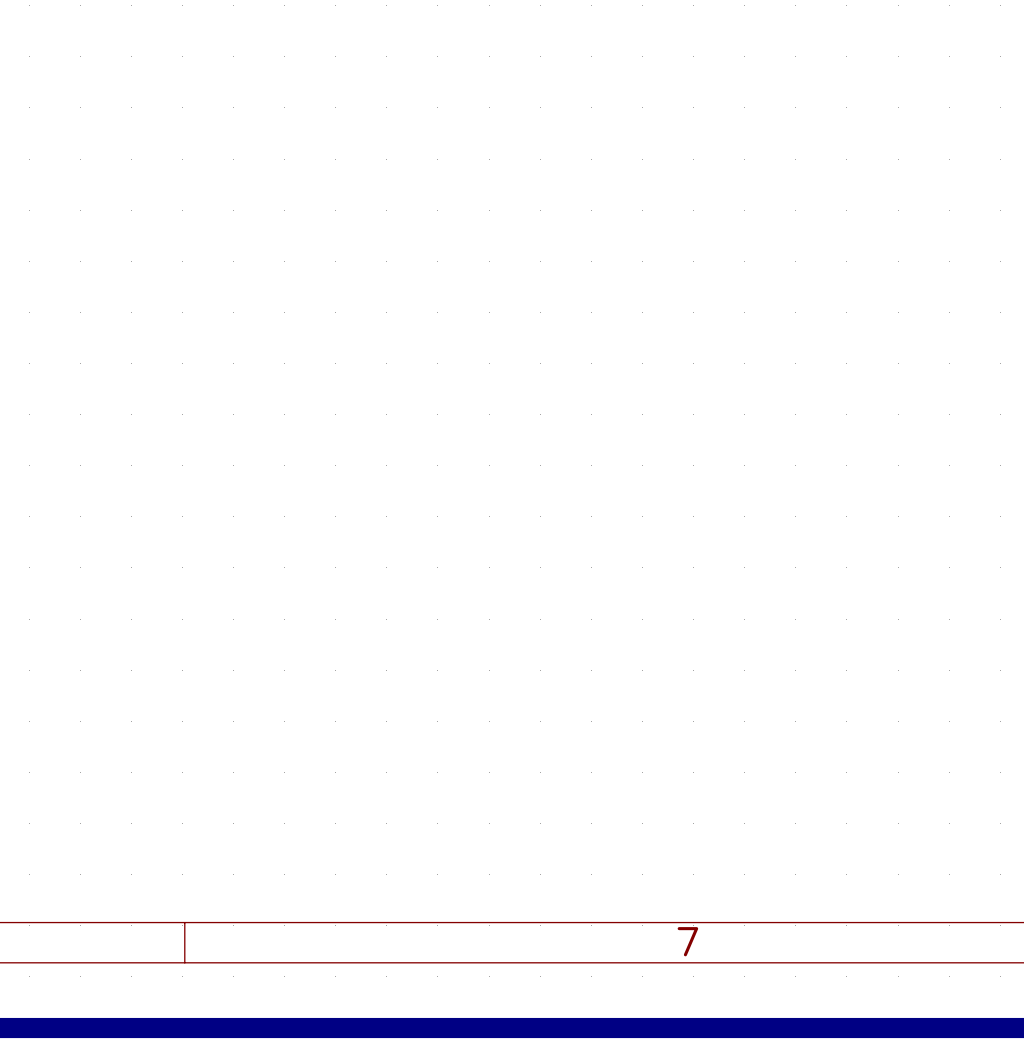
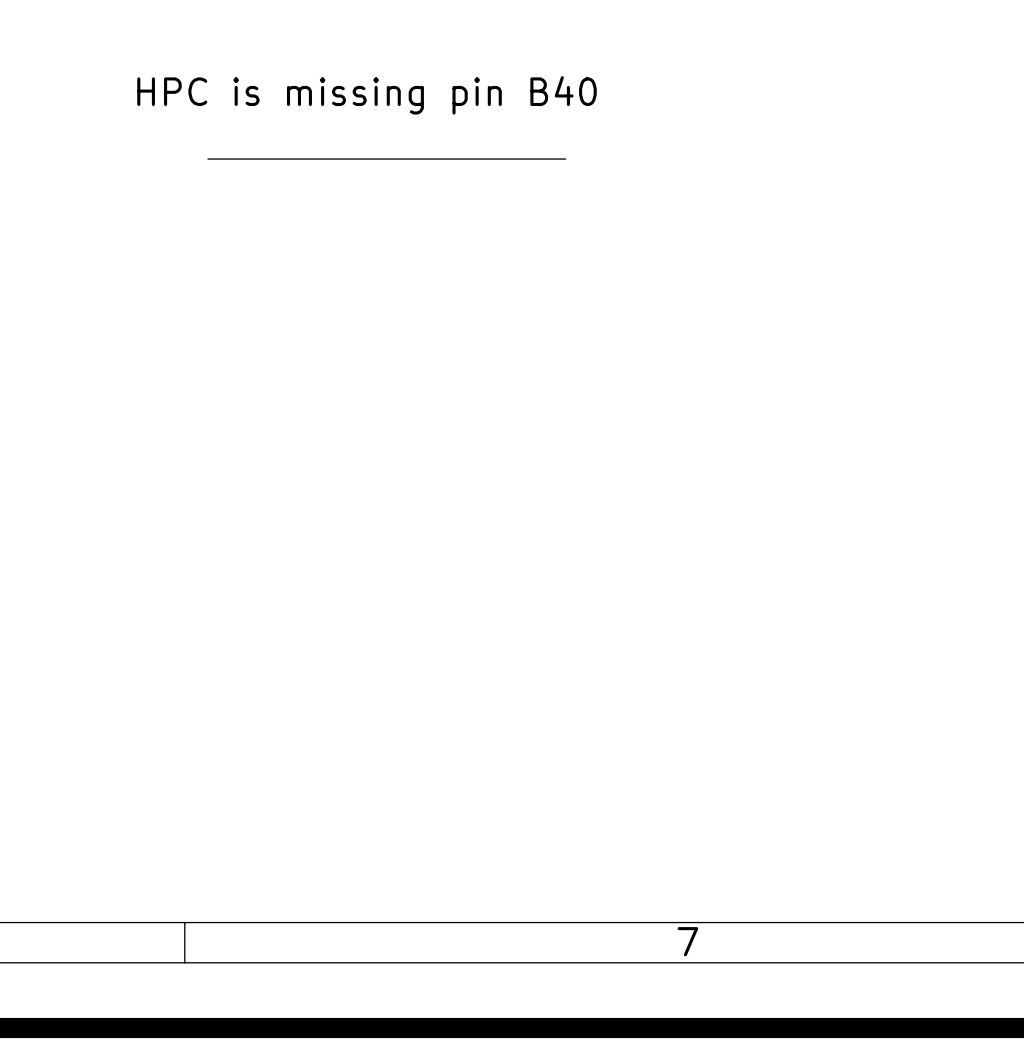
text: none -> HPC is missing pin B40 (367, 95)
line: none -> (207, 159) (565, 159)

